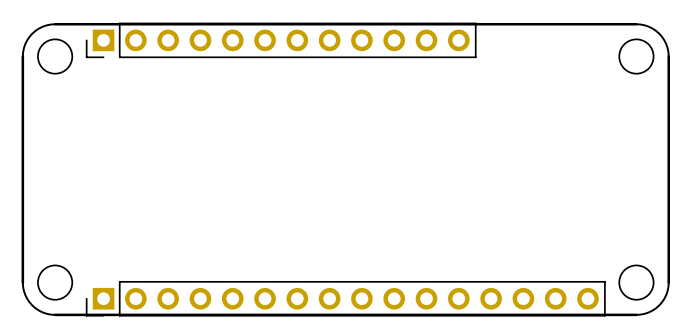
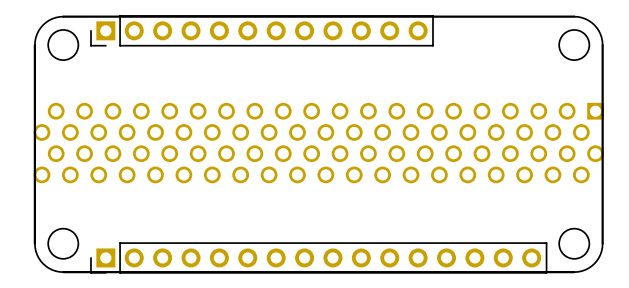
part: none -> (318, 143)

